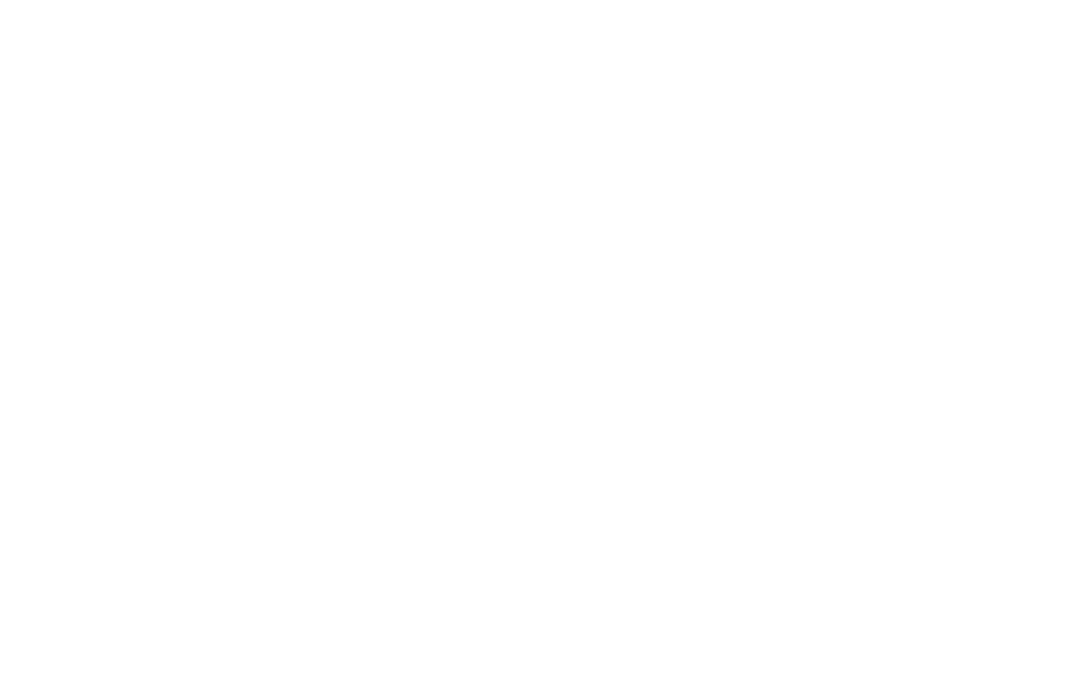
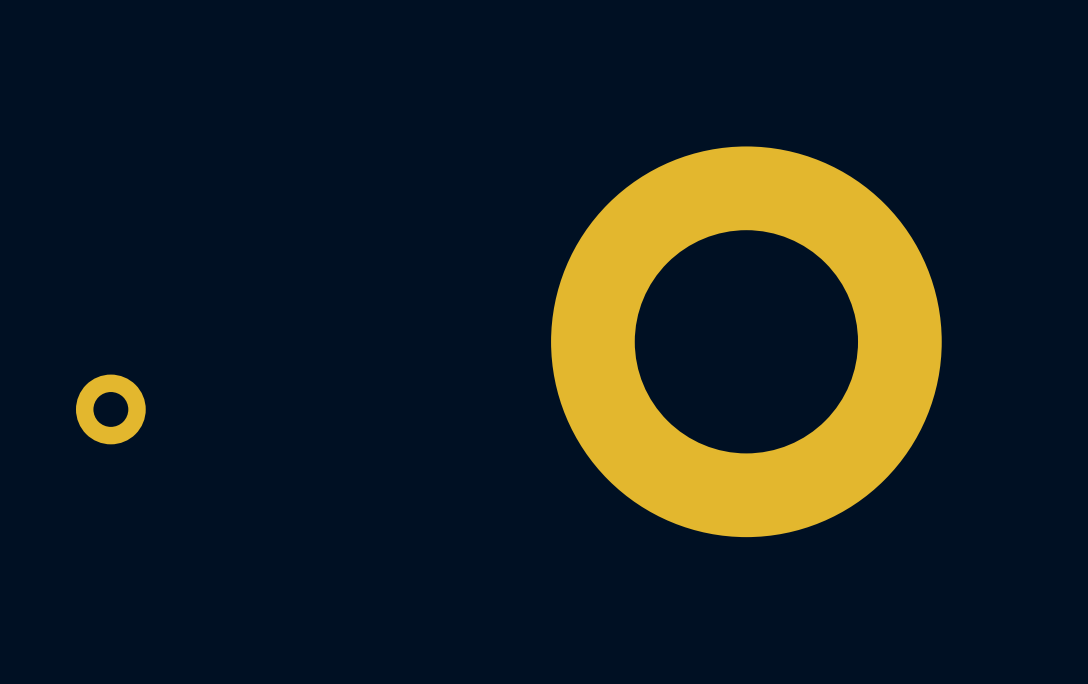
part: none -> (746, 341)
part: none -> (110, 409)

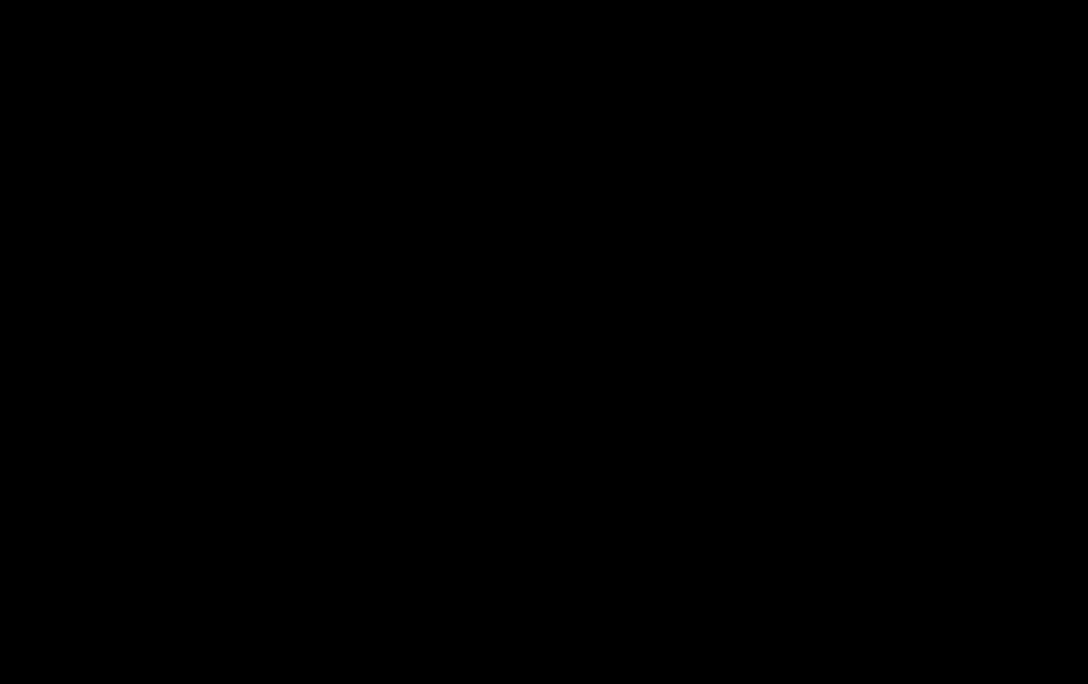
part: (746, 341) -> none
part: (110, 409) -> none

